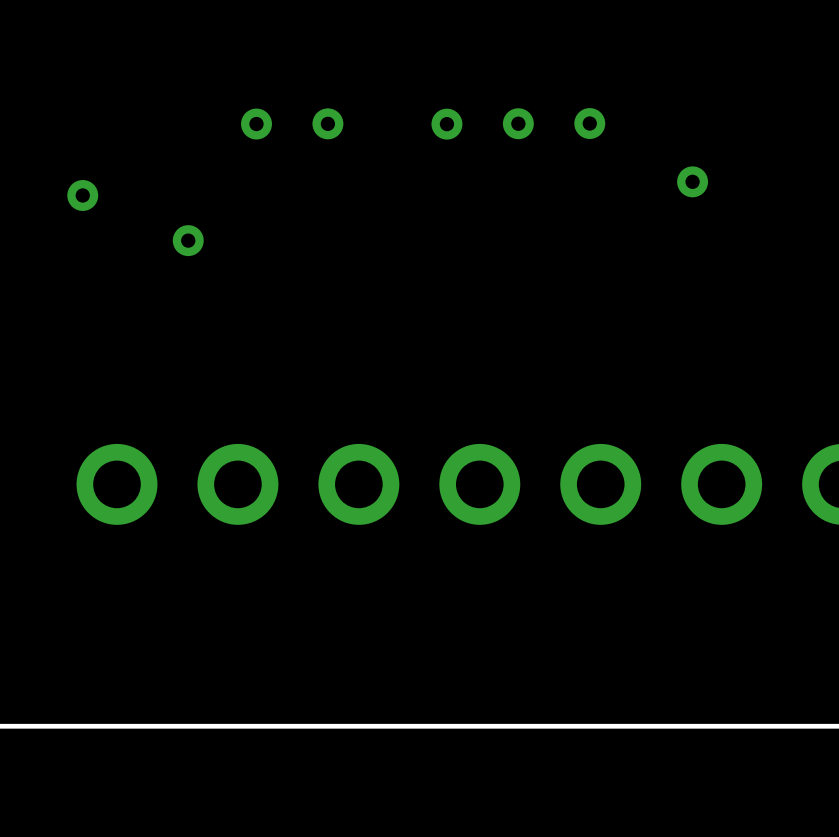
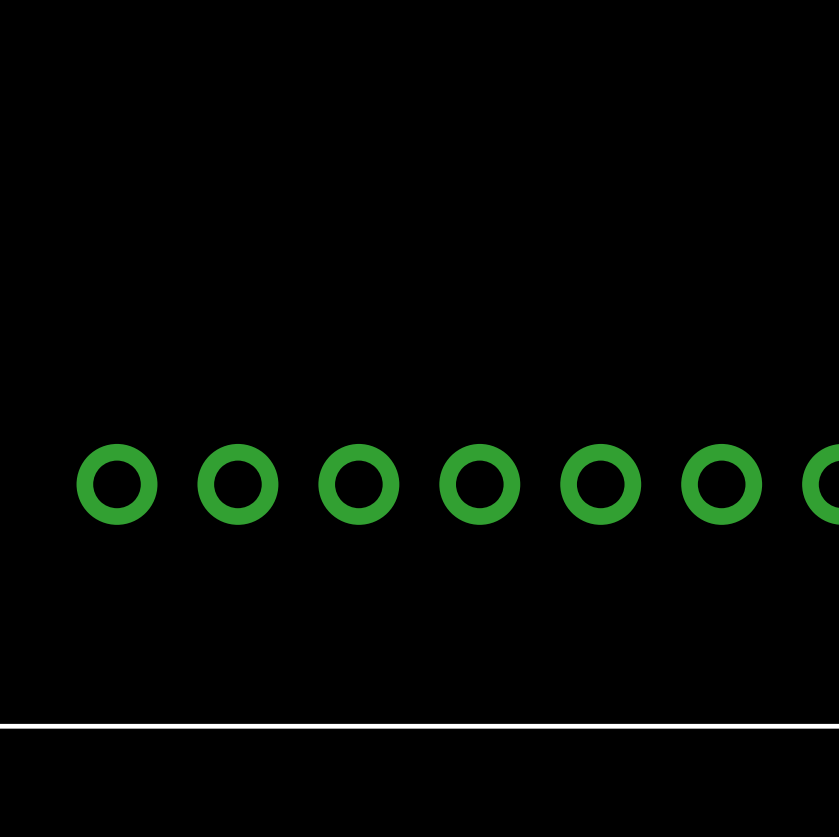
via: (327, 123) -> none
via: (518, 123) -> none
via: (589, 123) -> none
via: (256, 124) -> none
via: (446, 124) -> none
via: (692, 181) -> none
via: (82, 195) -> none
via: (188, 240) -> none

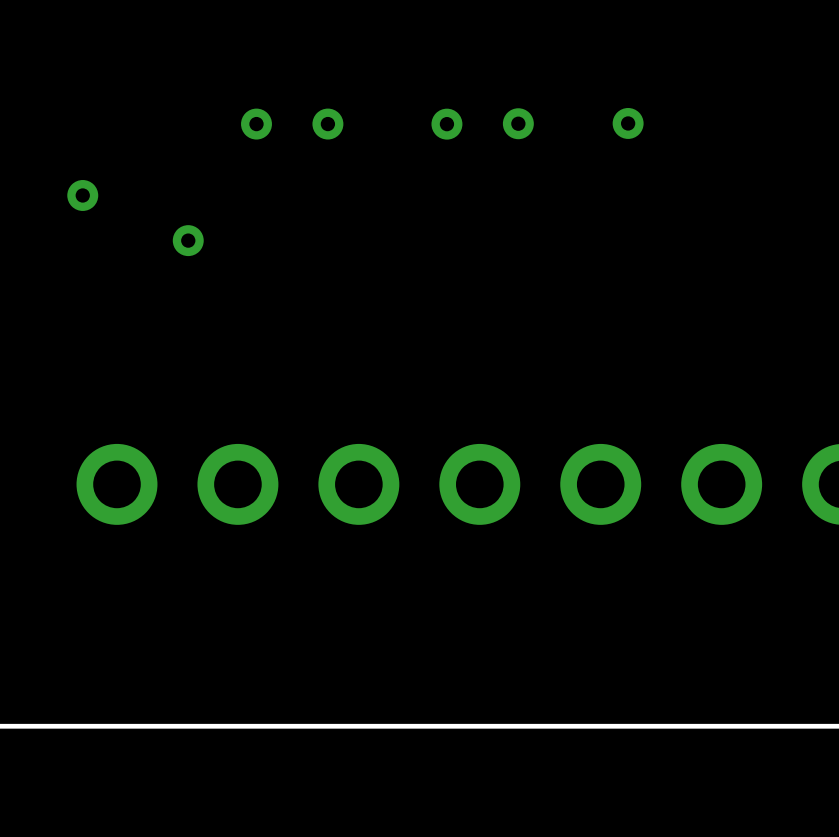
via: none -> (518, 123)
via: none -> (628, 123)
via: none -> (256, 124)
via: none -> (327, 124)
via: none -> (446, 124)
via: none -> (82, 195)
via: none -> (188, 240)

